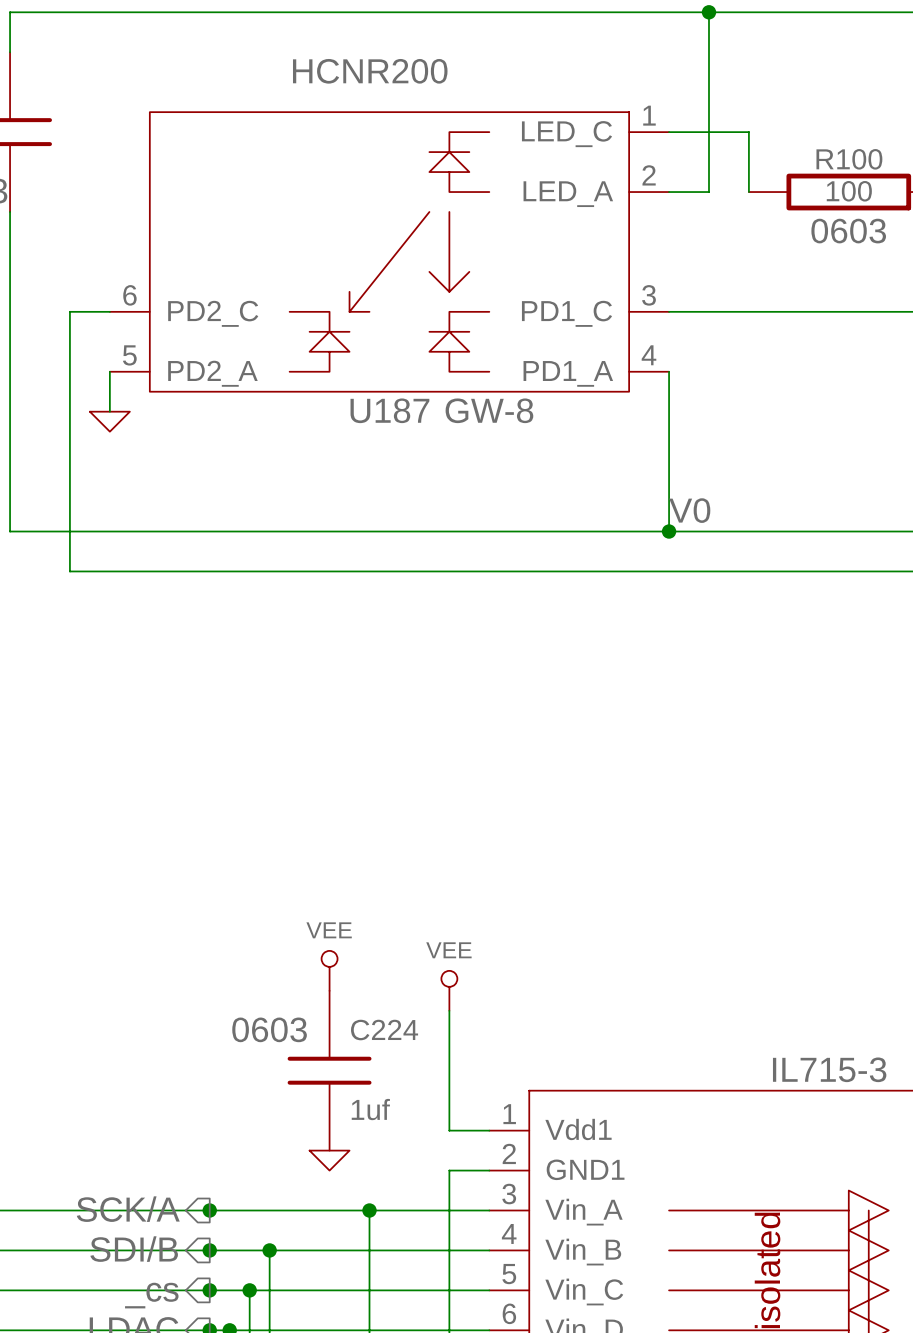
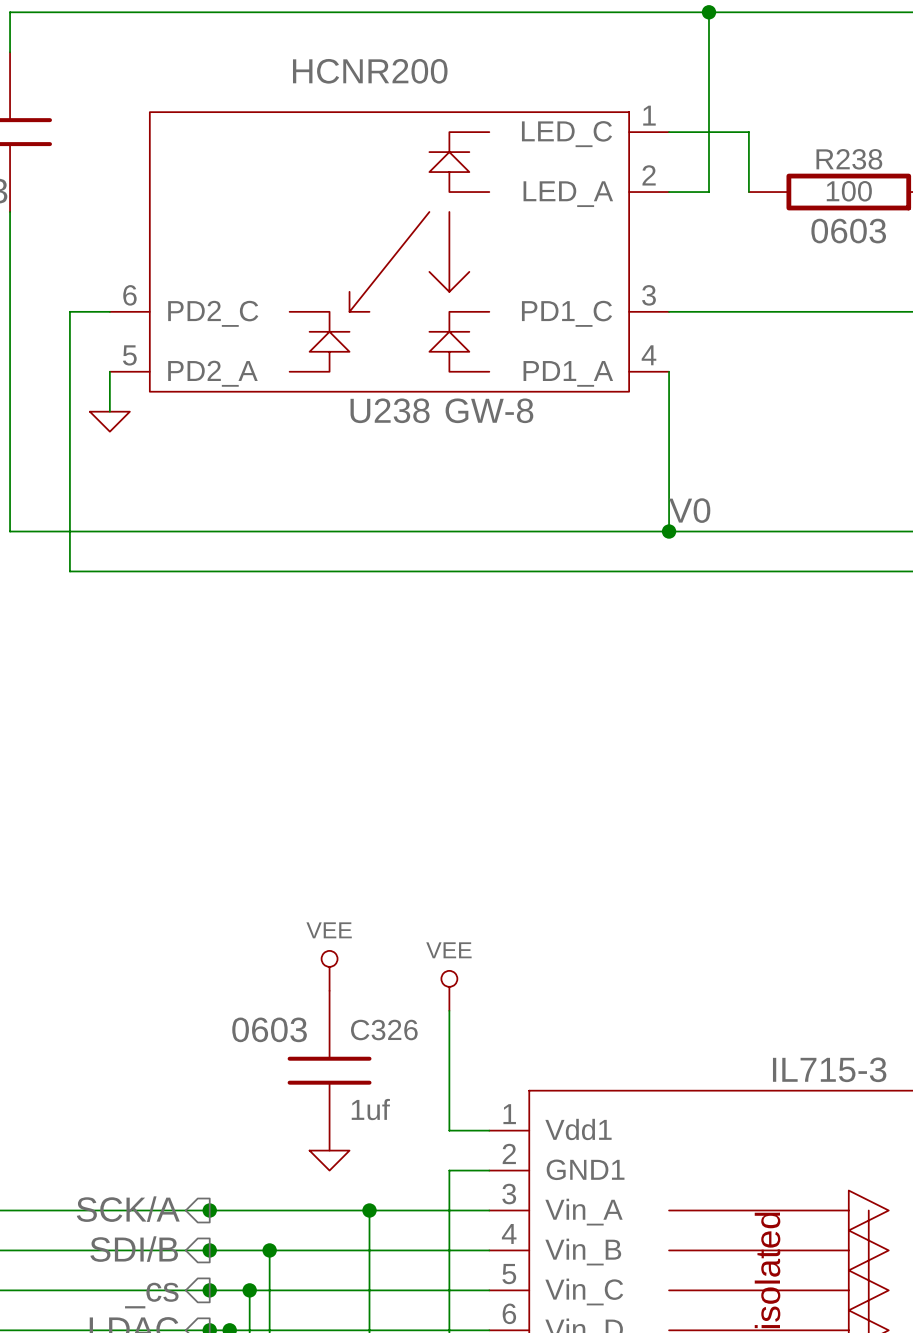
R100 name: R100 (849, 159) -> R238 (849, 159)
U187 name: U187 (389, 410) -> U238 (390, 410)
C224 name: C224 (384, 1030) -> C326 (384, 1030)

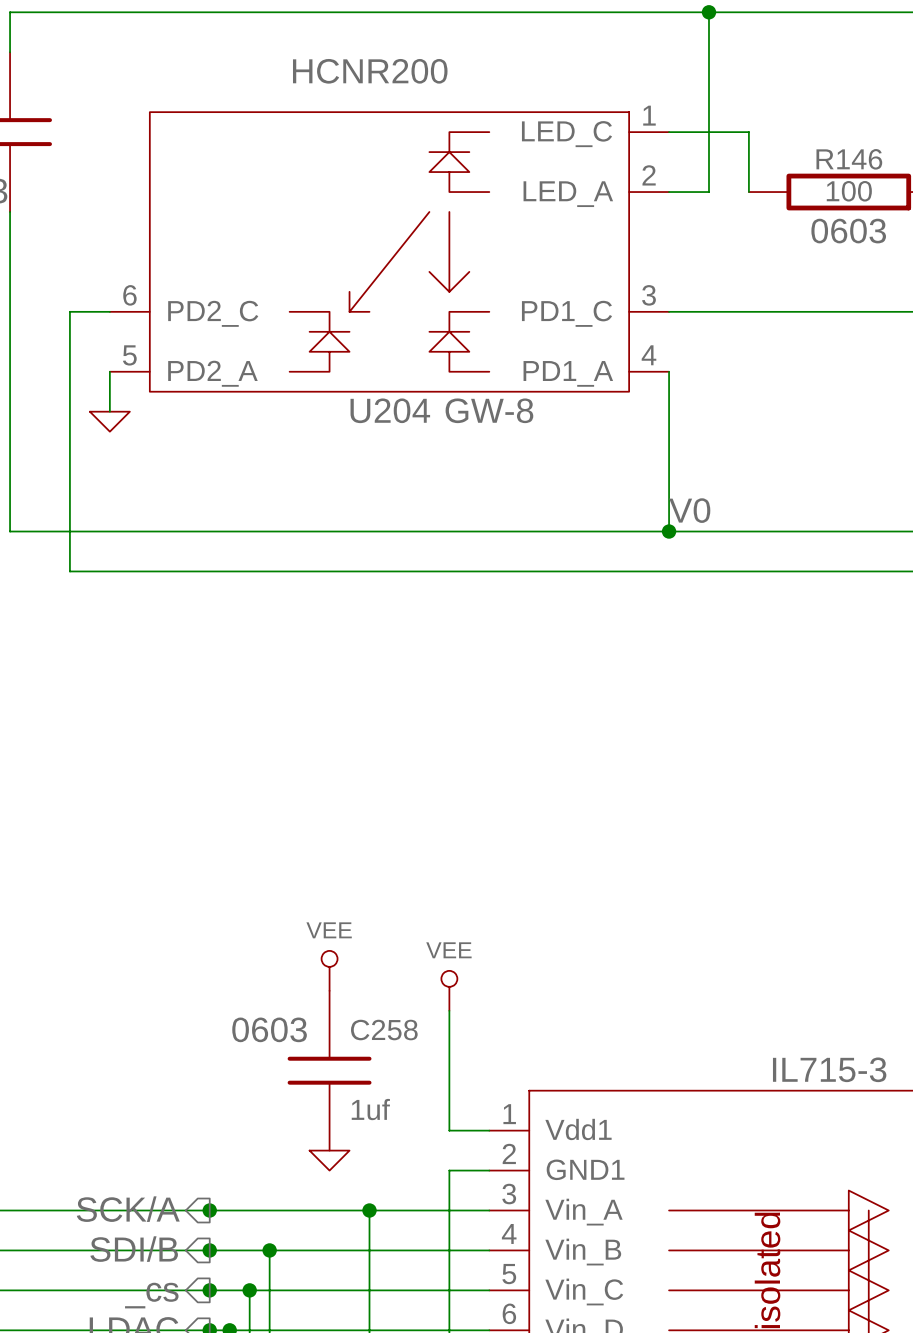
R238 name: R238 (849, 159) -> R146 (849, 159)
U238 name: U238 (390, 410) -> U204 (390, 410)
C326 name: C326 (384, 1030) -> C258 (384, 1030)

